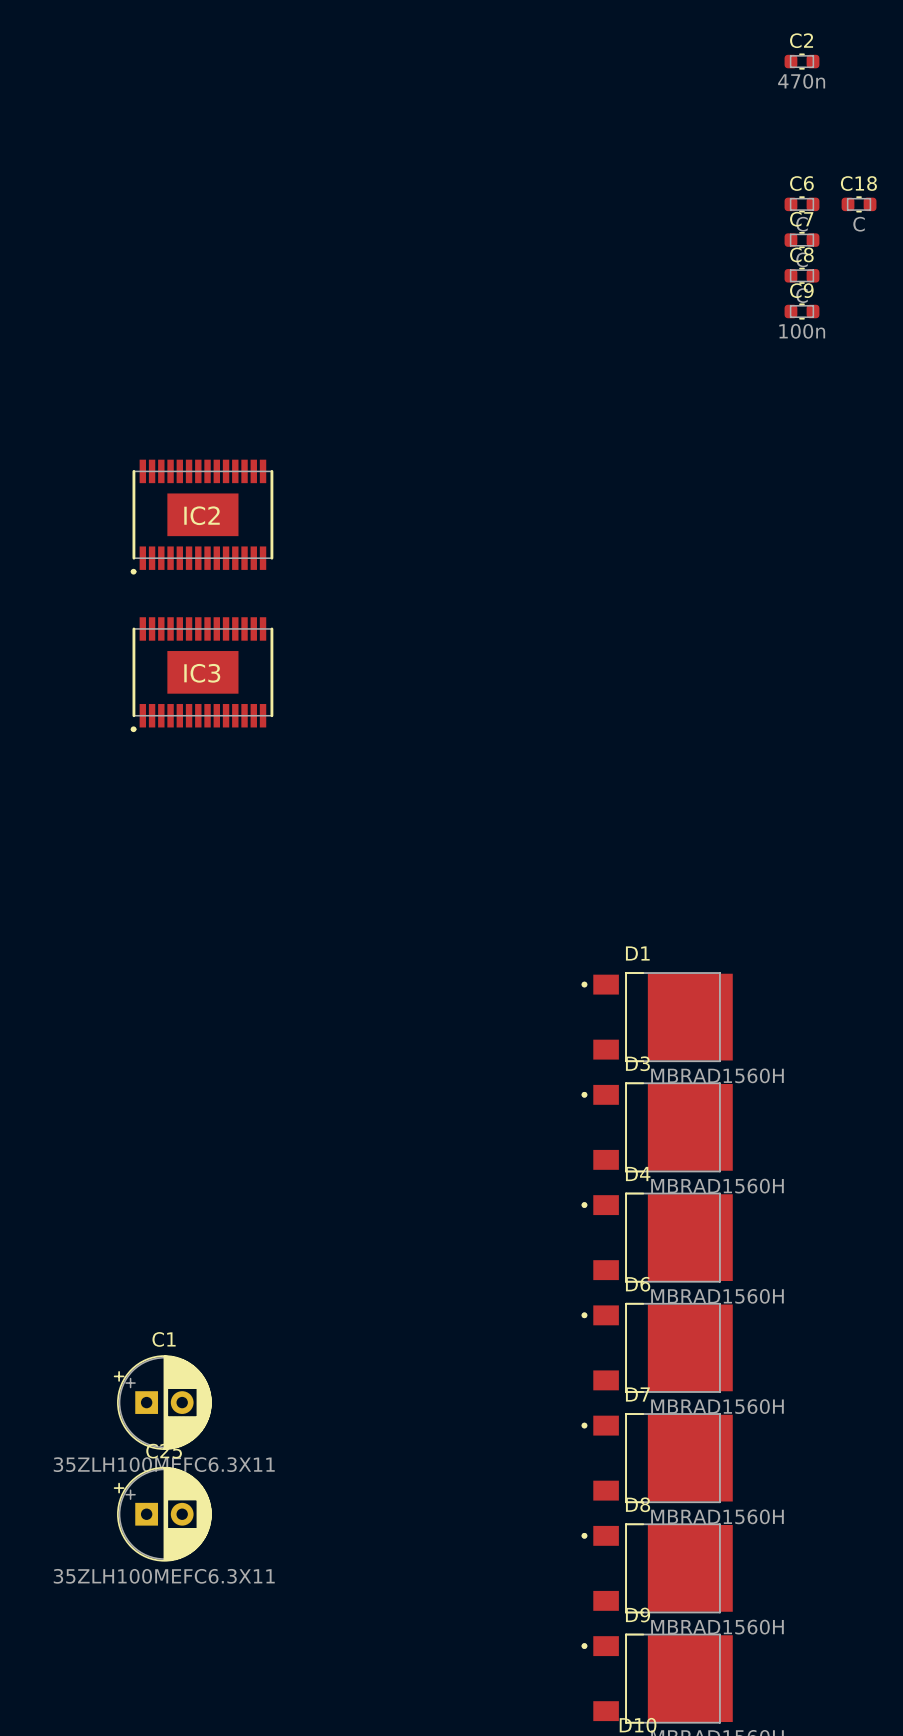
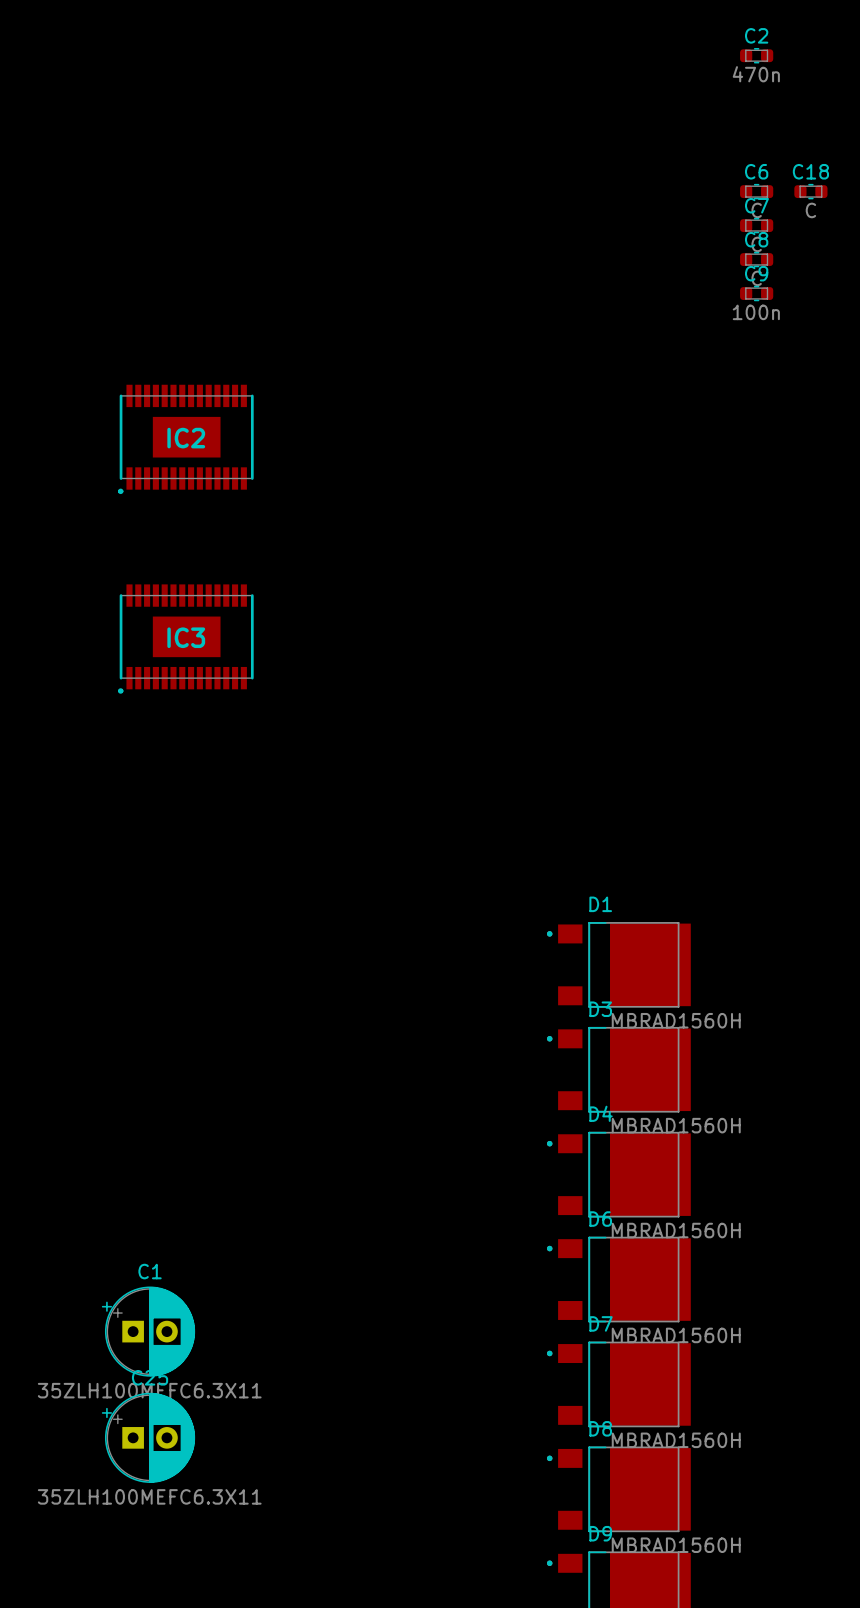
IC2 position: (202, 517) -> (185, 439)

